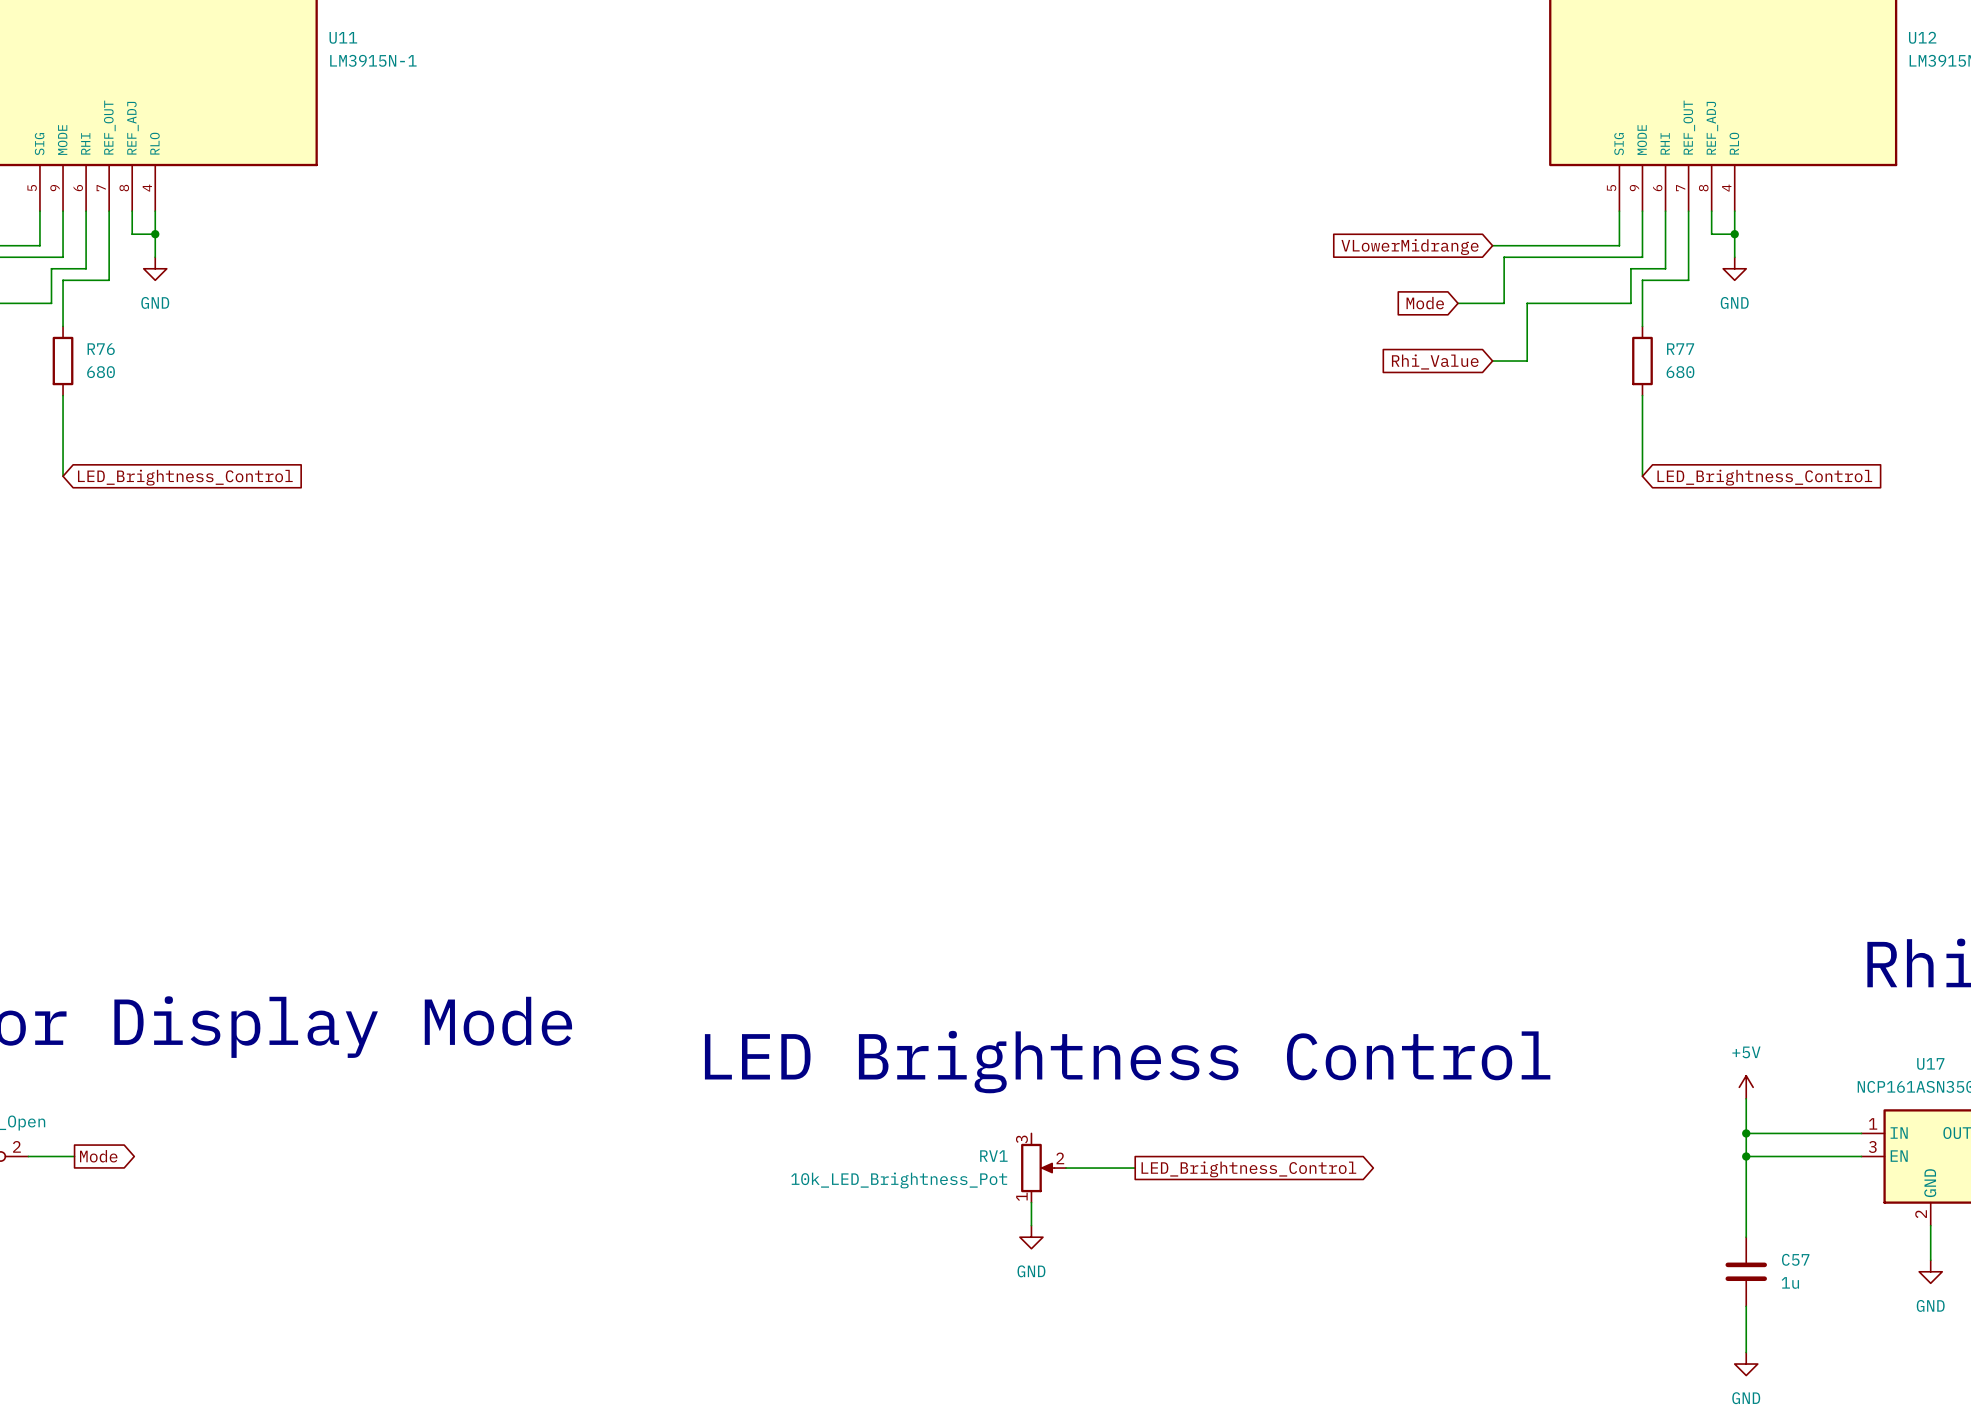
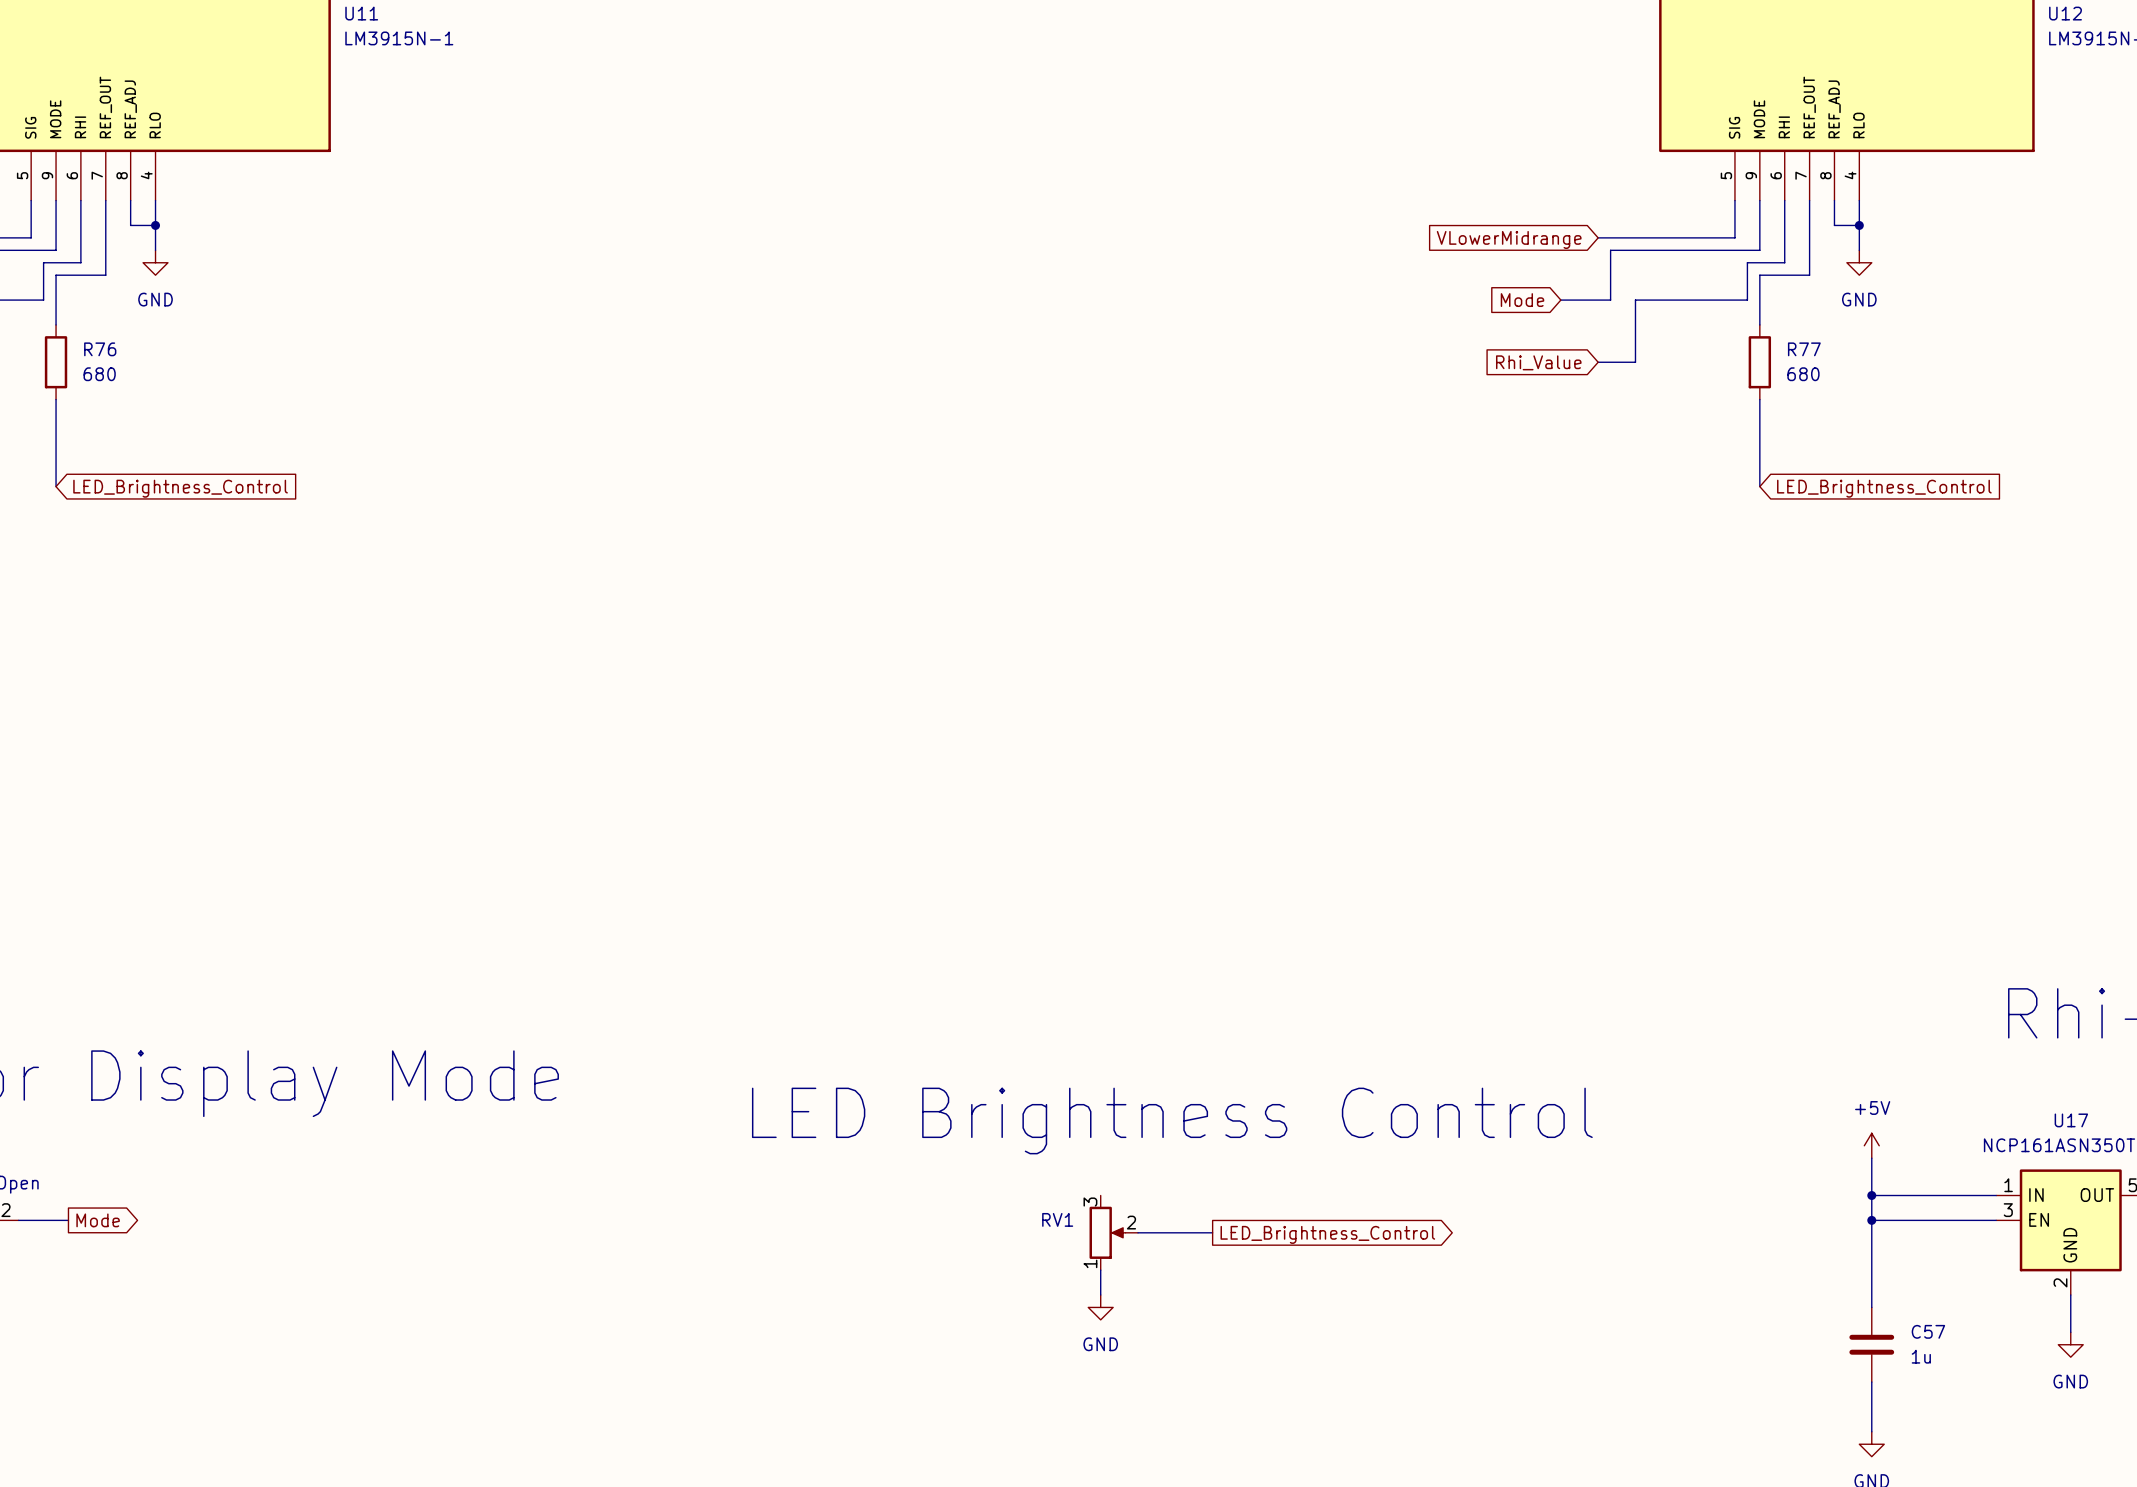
RV1 value: 10k_LED_Brightness_Pot (899, 1180) -> none

